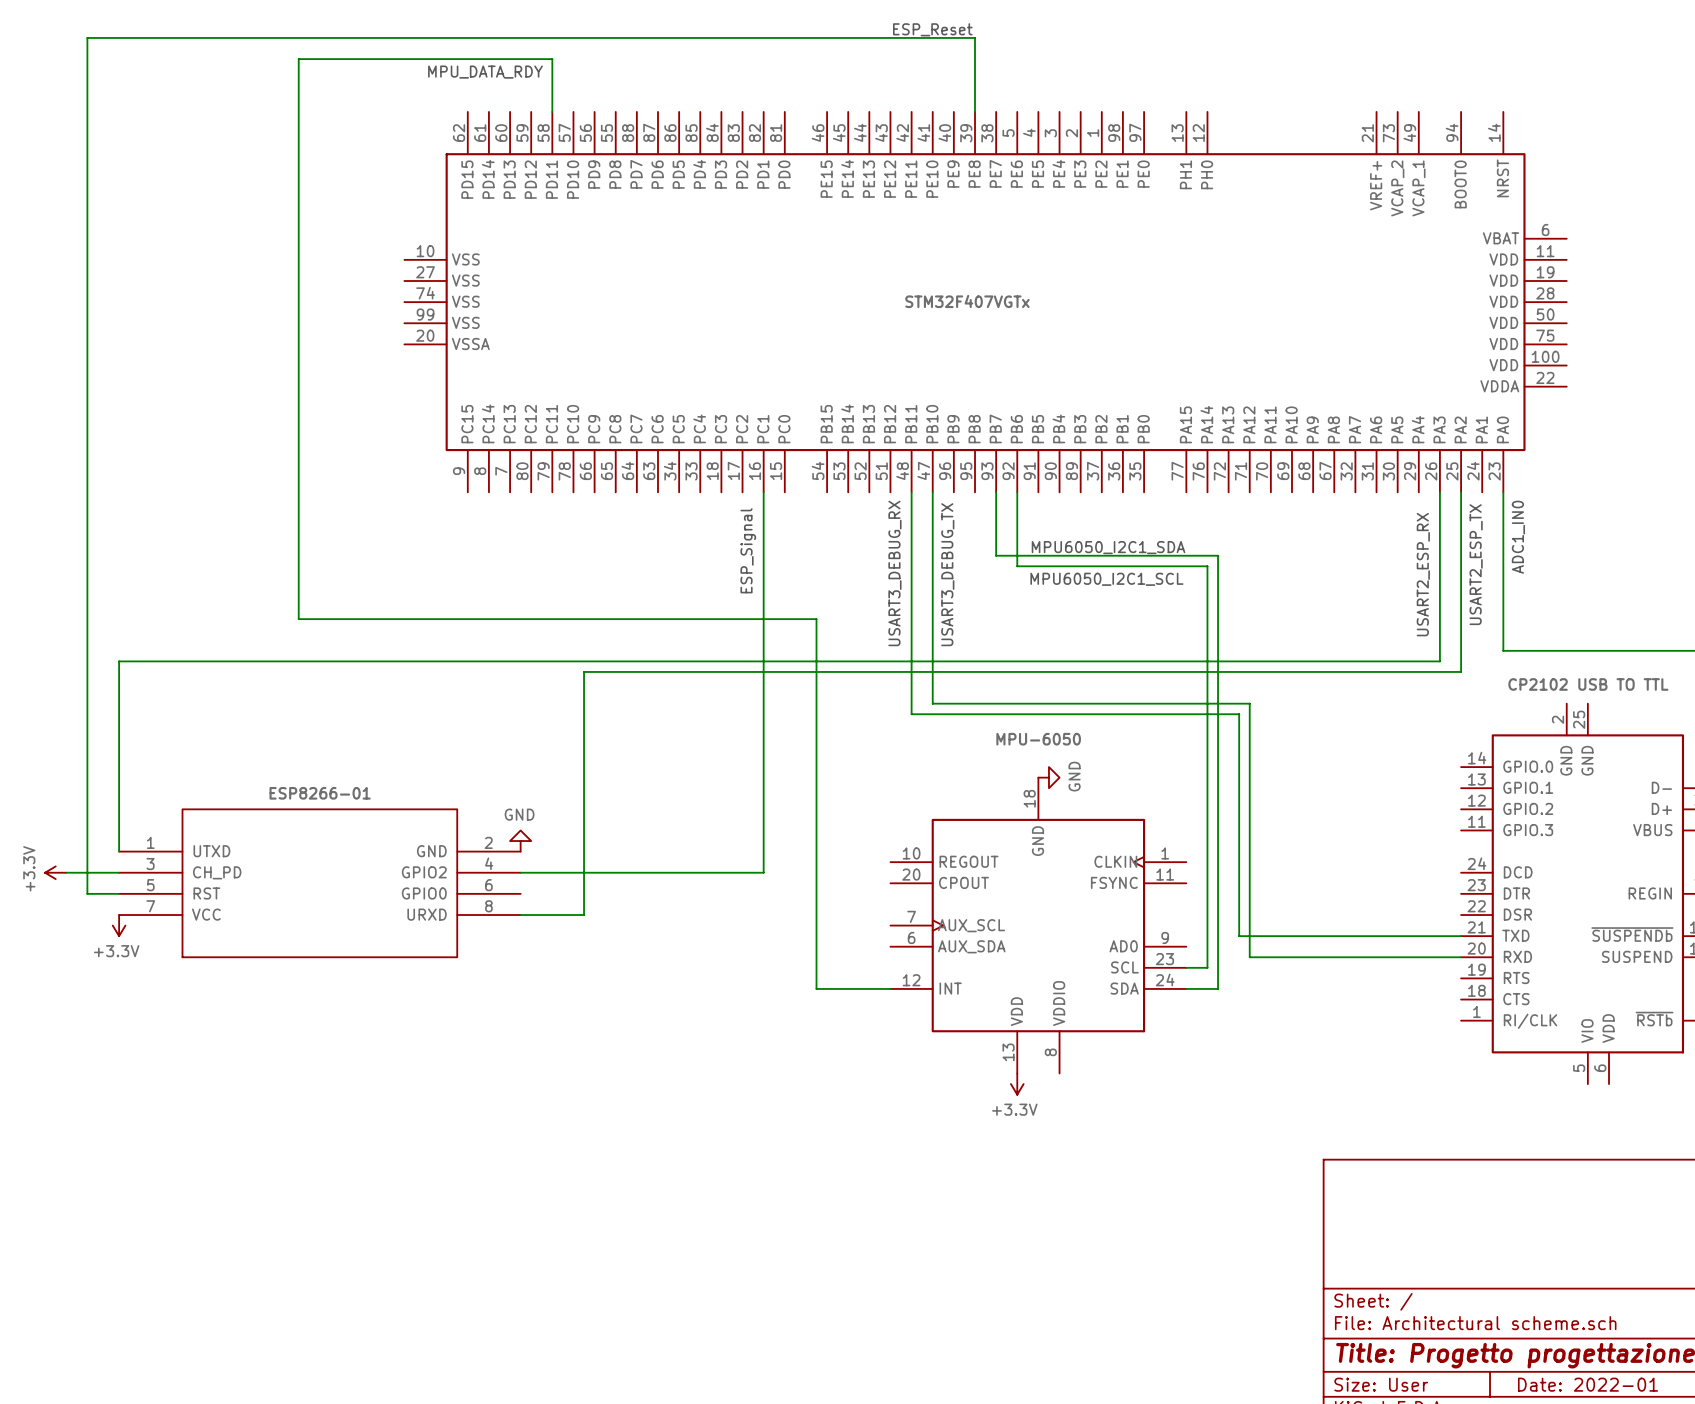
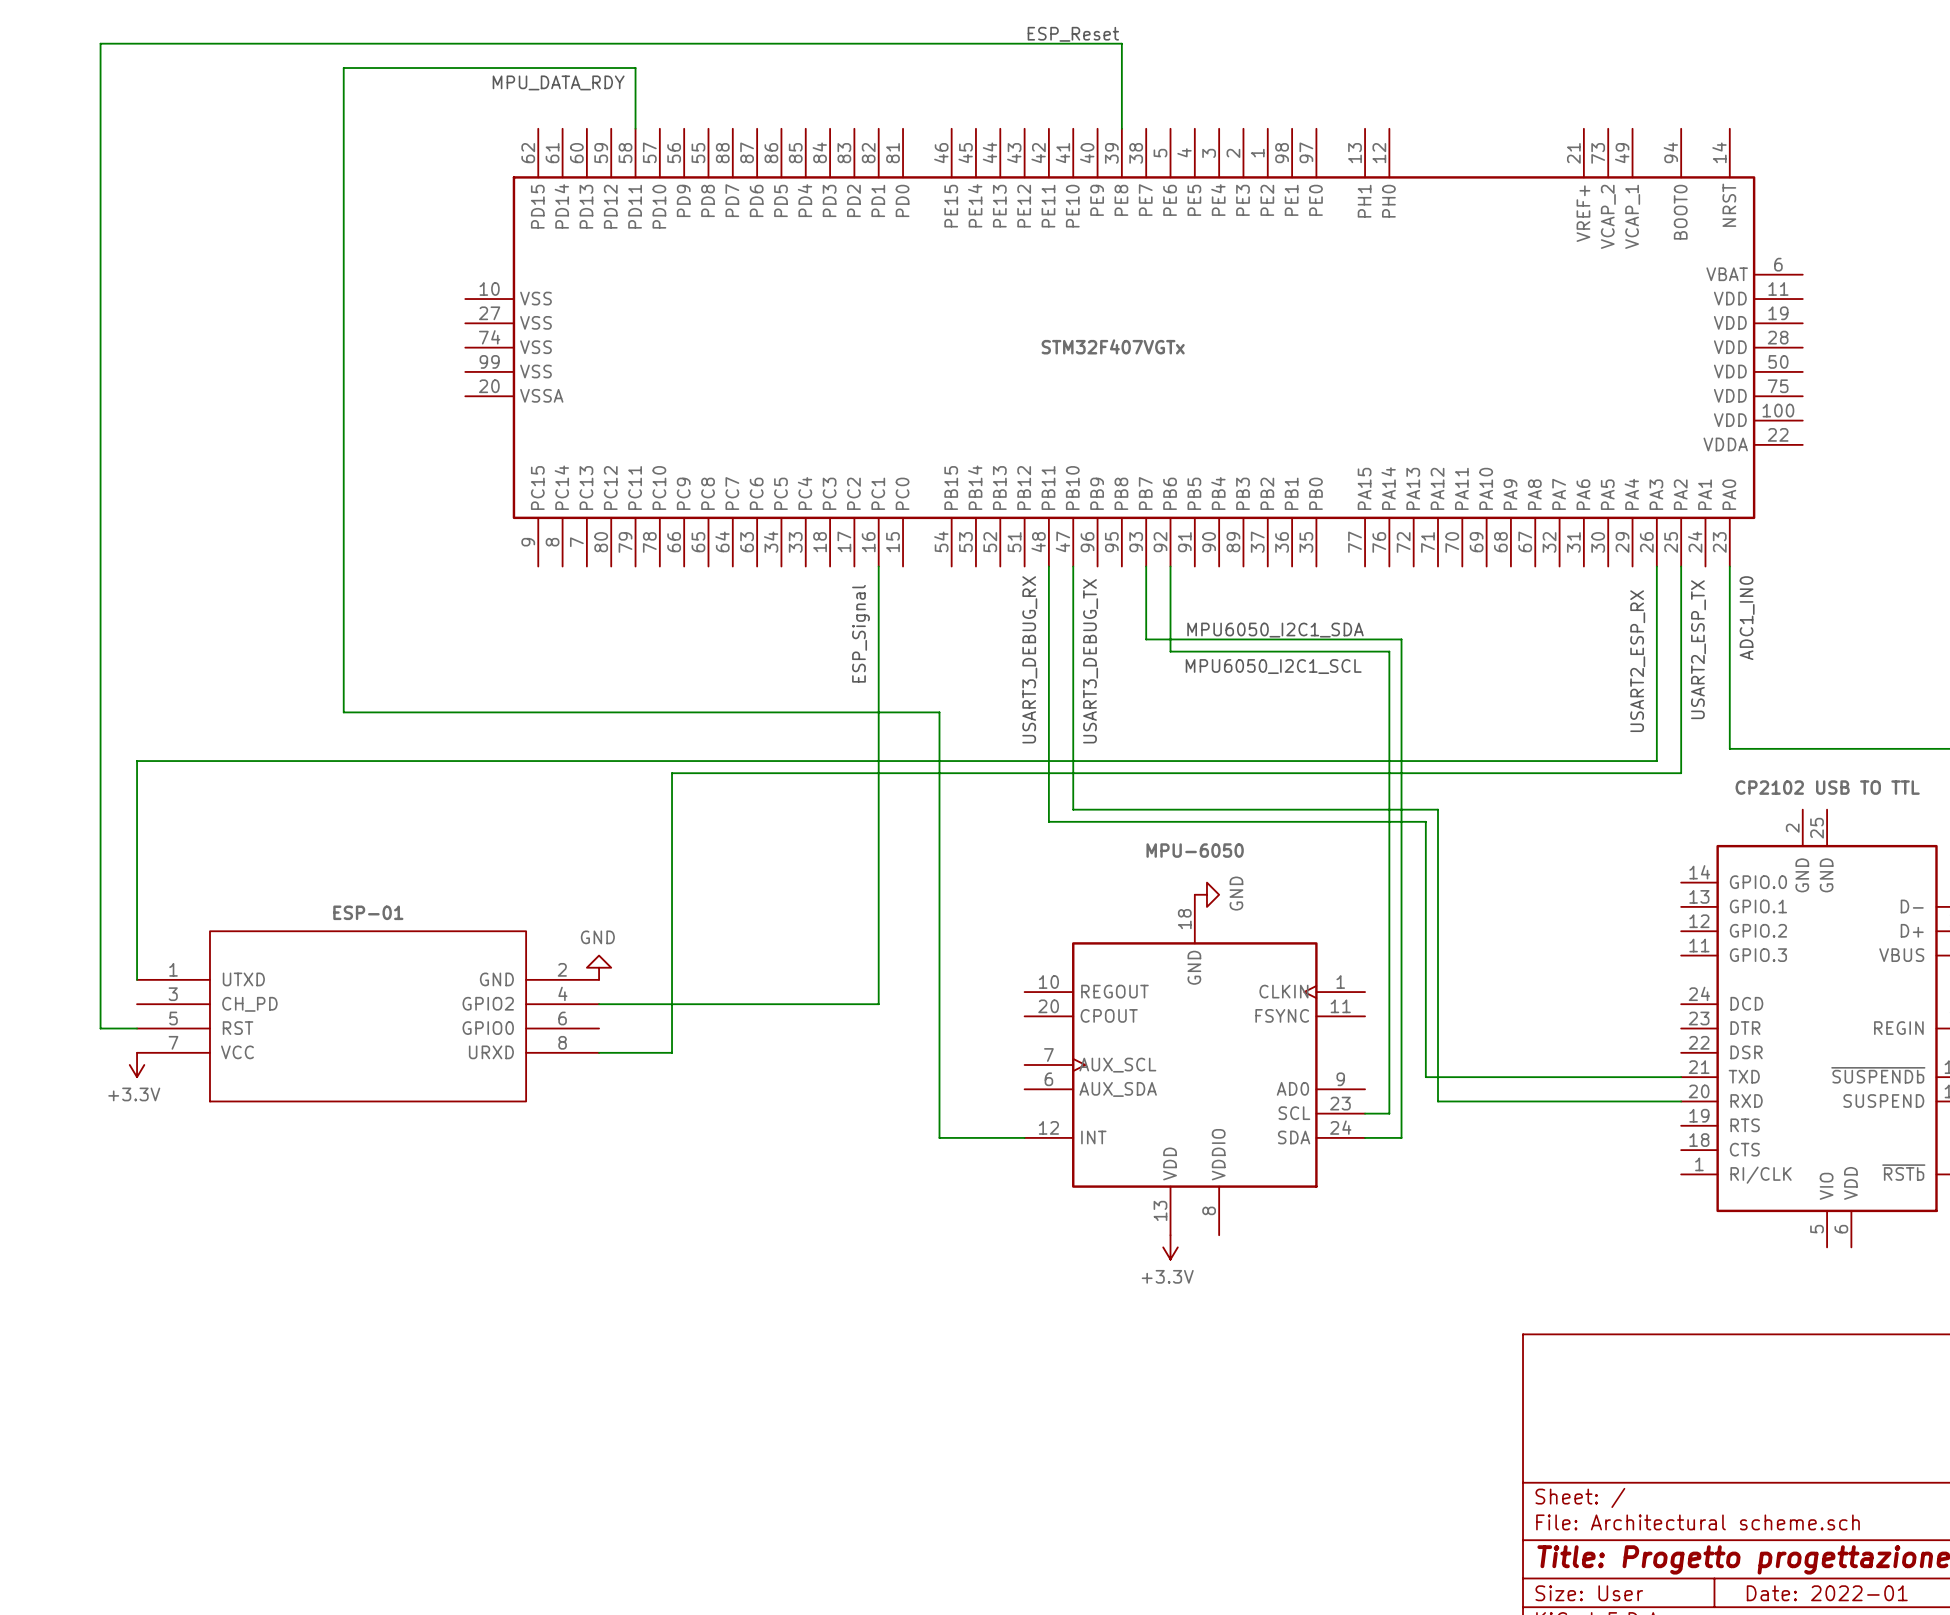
part value: ESP8266-01 (320, 793) -> ESP-01 (368, 912)
power symbol: +3.3V (55, 872) -> none
wire: (66, 872) (119, 872) -> none

